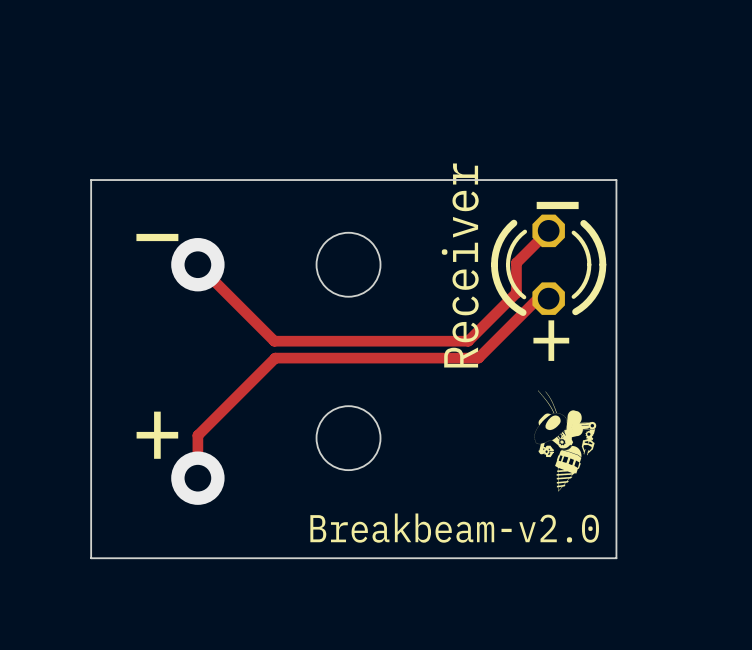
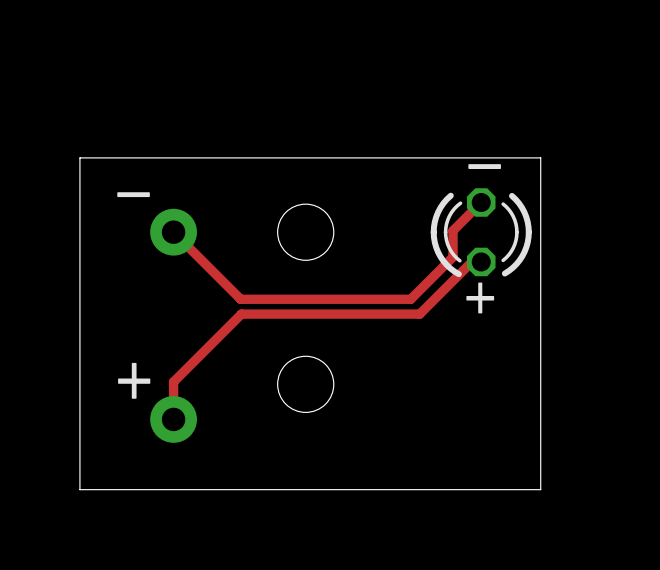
text: Receiver (460, 265) -> none
drawing: [534, 390, 597, 492] -> none
text: Breakbeam-v2.0 (454, 528) -> none

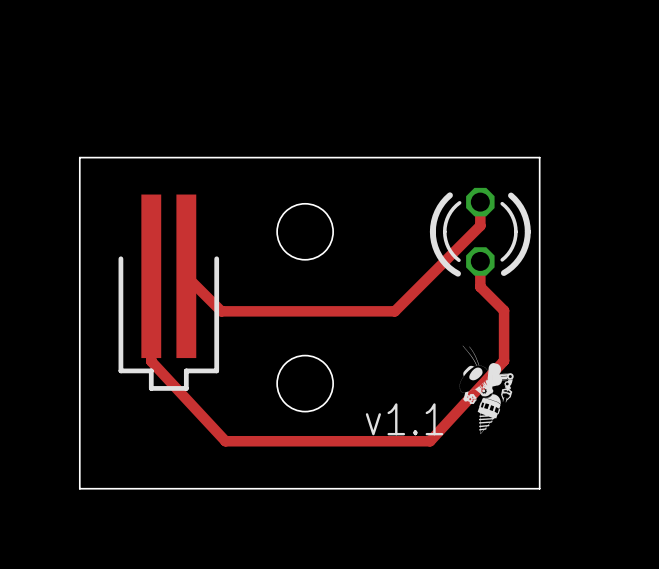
text: _ (484, 166) -> none
text: _ (133, 194) -> none
track: (481, 202) (453, 230) (453, 257) (410, 299) (240, 299) (173, 232) -> (480, 202) (480, 225) (394, 311) (221, 311) (186, 276)
via: (173, 232) -> none
track: (481, 261) (471, 261) (419, 314) (241, 314) (173, 381) (173, 419) -> (480, 261) (480, 286) (504, 310) (504, 360) (430, 441) (225, 441) (151, 361) (151, 276)
part: none -> (168, 292)
text: + (480, 297) -> none
drawing: none -> [459, 345, 514, 435]
text: + (134, 380) -> none
via: (173, 419) -> none
text: none -> v1.1 (404, 419)

